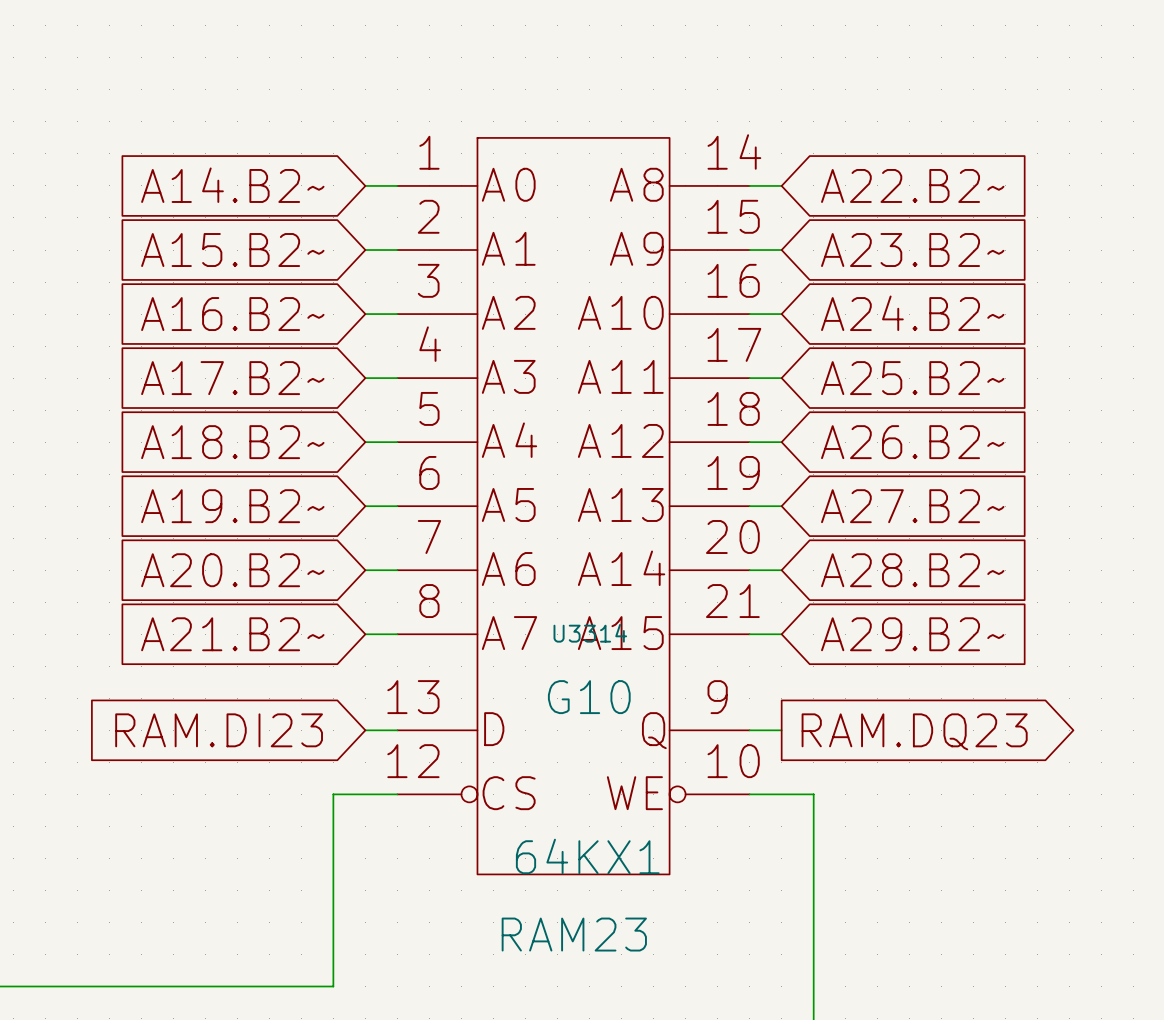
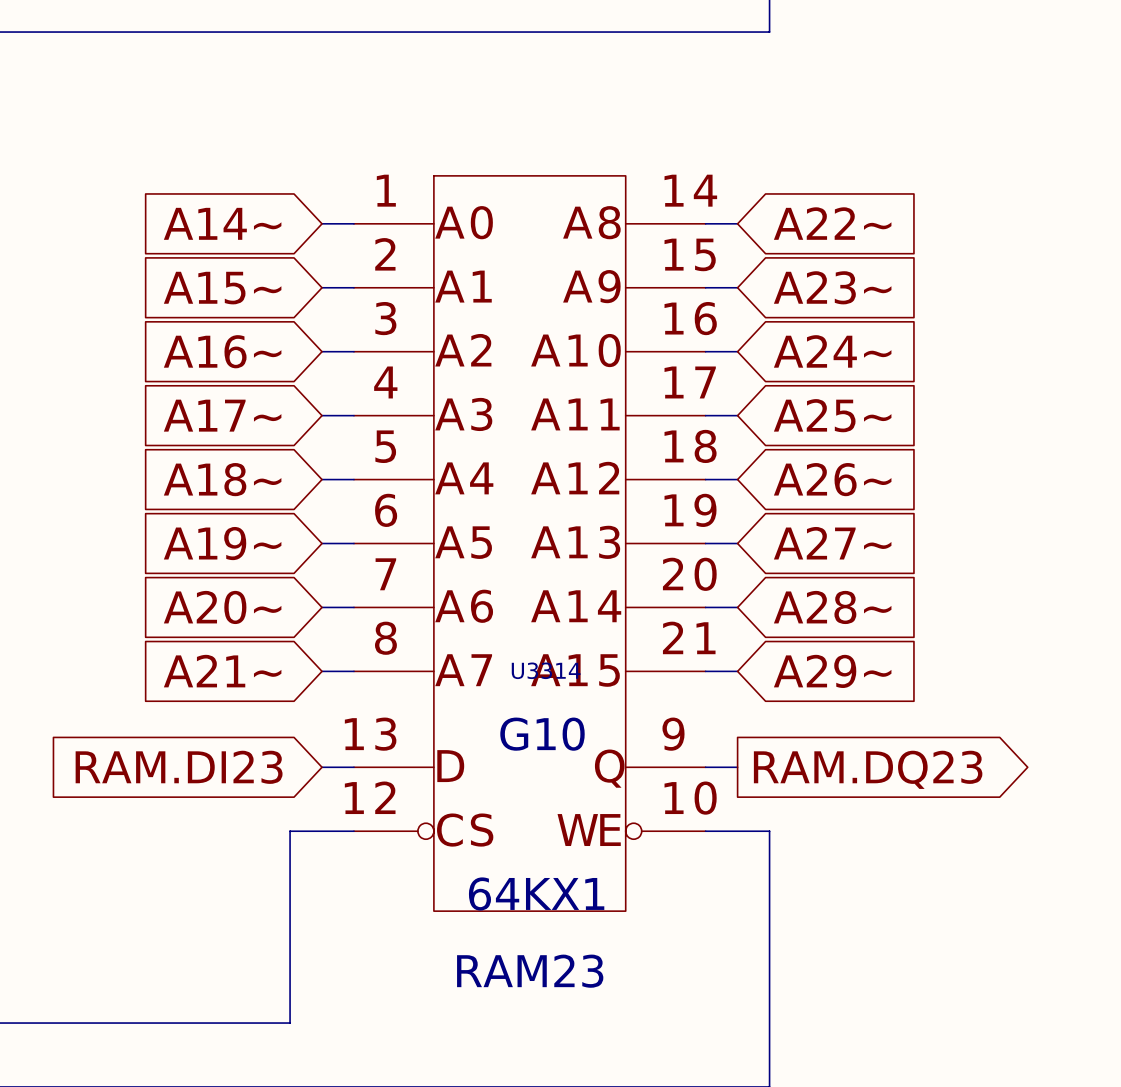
global label: A14.B2~ (232, 185) -> A14~ (222, 223)
global label: A22.B2~ (912, 185) -> A22~ (832, 223)
global label: A15.B2~ (232, 250) -> A15~ (222, 288)
global label: A23.B2~ (912, 250) -> A23~ (832, 287)
global label: A24.B2~ (912, 313) -> A24~ (832, 351)
global label: A16.B2~ (232, 314) -> A16~ (222, 351)
global label: A17.B2~ (232, 378) -> A17~ (222, 415)
global label: A25.B2~ (912, 378) -> A25~ (832, 415)
global label: A18.B2~ (232, 442) -> A18~ (222, 479)
global label: A26.B2~ (912, 442) -> A26~ (832, 479)
global label: A19.B2~ (232, 506) -> A19~ (222, 543)
global label: A27.B2~ (912, 506) -> A27~ (832, 543)
global label: A20.B2~ (232, 570) -> A20~ (222, 607)
global label: A28.B2~ (912, 570) -> A28~ (832, 607)
global label: A21.B2~ (232, 634) -> A21~ (222, 671)
global label: A29.B2~ (912, 634) -> A29~ (832, 671)

